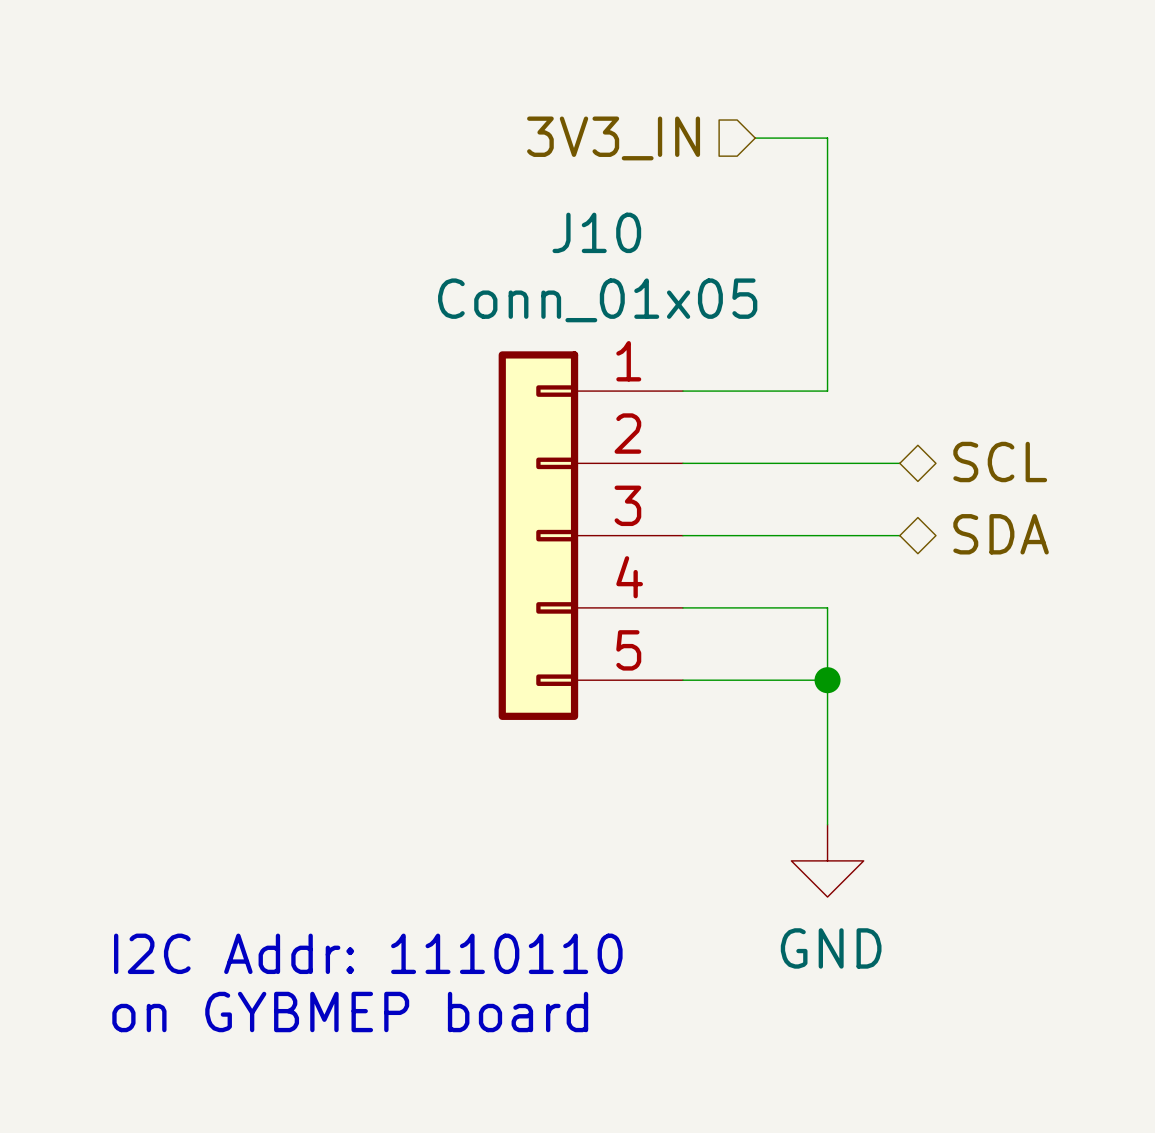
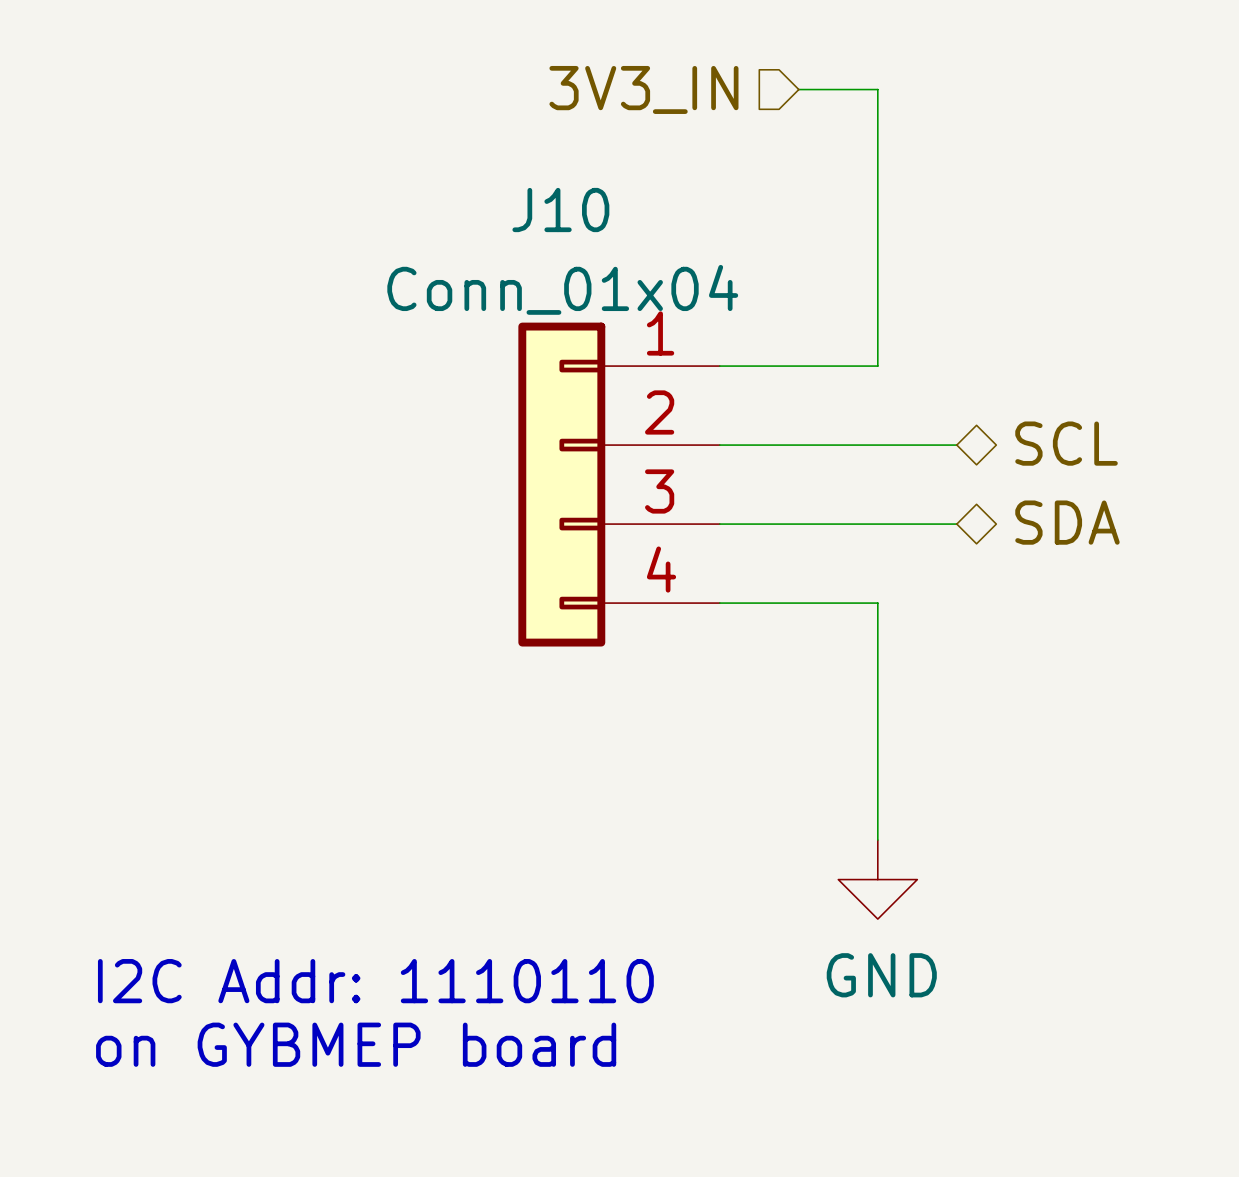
J10 name position: J10 (596, 232) -> J10 (560, 210)
J10 value: Conn_01x05 (597, 300) -> Conn_01x04 (562, 289)
J10 symbol: [498, 351, 683, 720] -> [518, 322, 720, 647]
wire: (682, 680) (827, 680) -> none
junction: (827, 680) -> none

